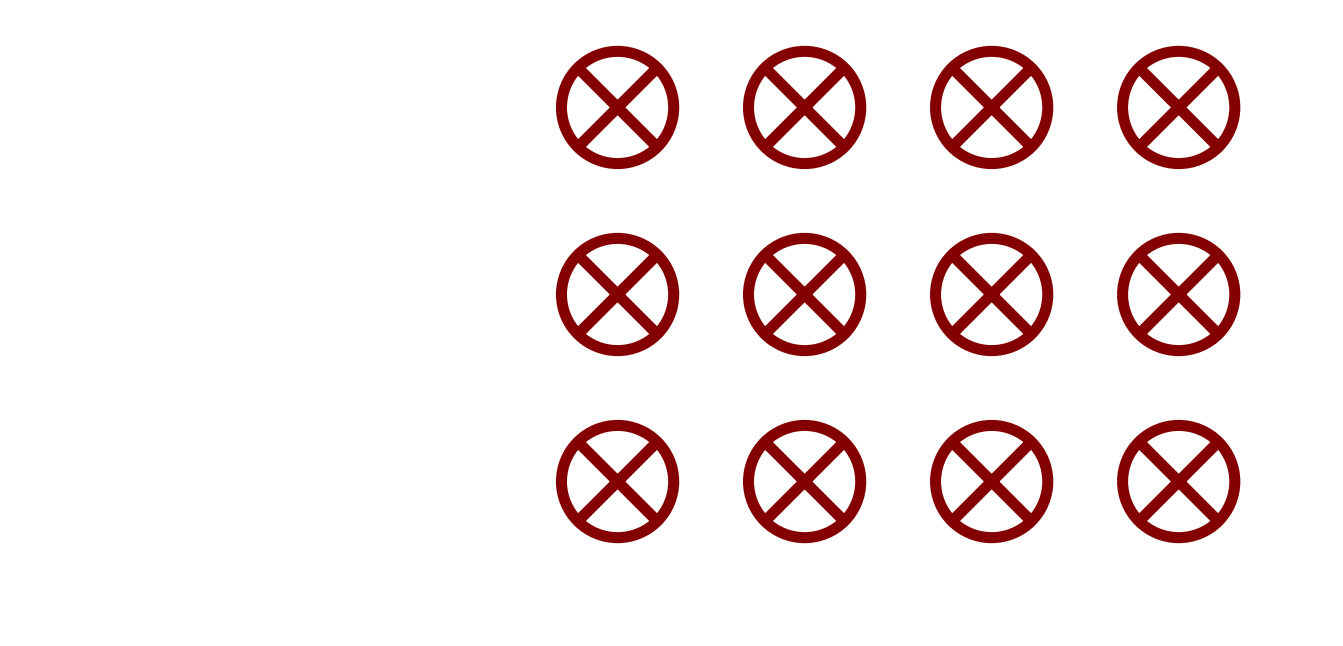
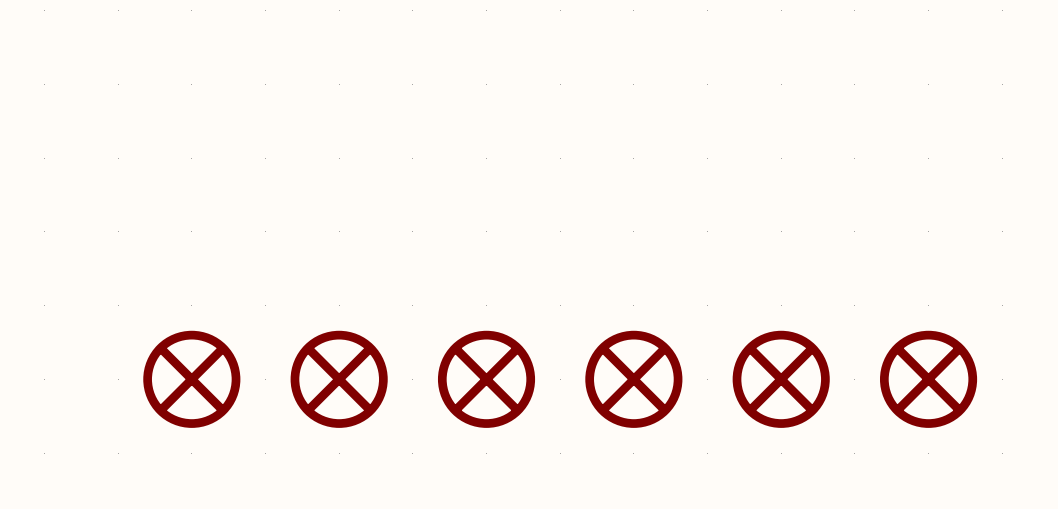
part: (617, 107) -> none
part: (804, 107) -> none
part: (991, 107) -> none
part: (1178, 107) -> none
part: (617, 294) -> none
part: (804, 294) -> none
part: (991, 294) -> none
part: (1178, 294) -> none
part: none -> (191, 379)
part: none -> (339, 379)

